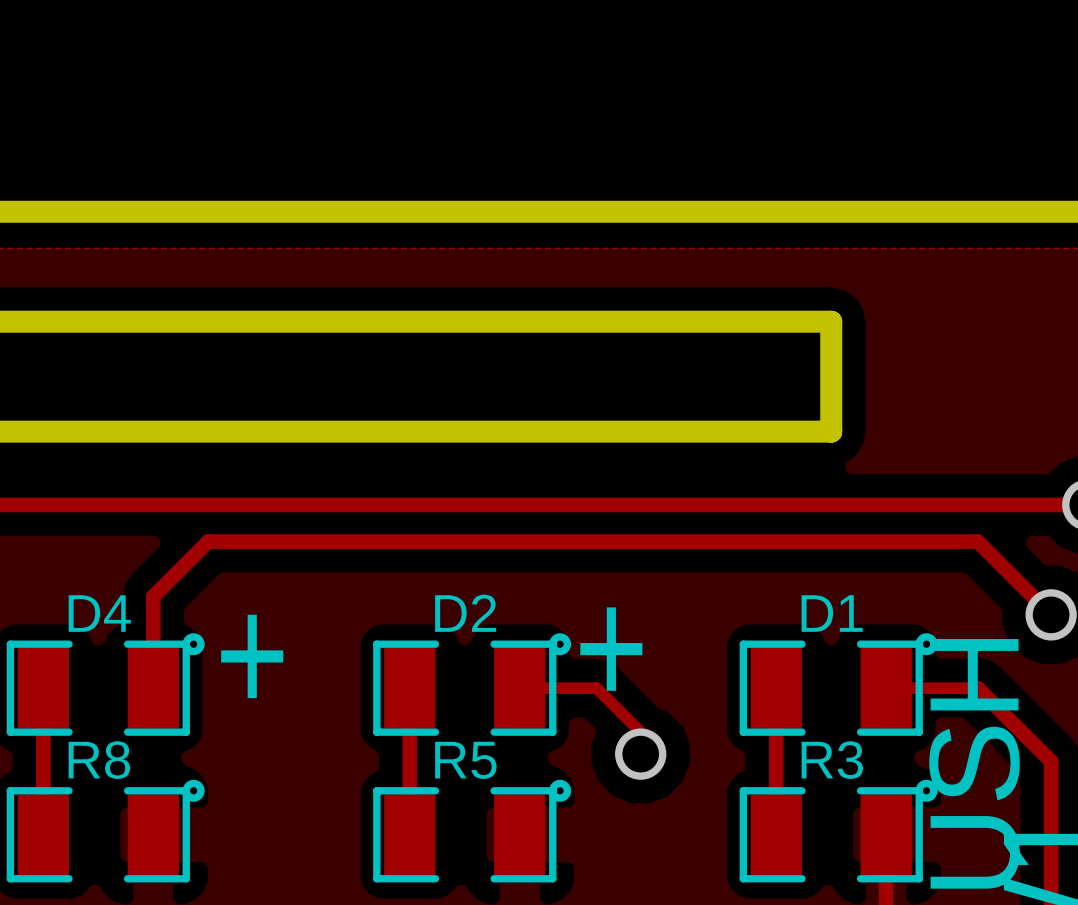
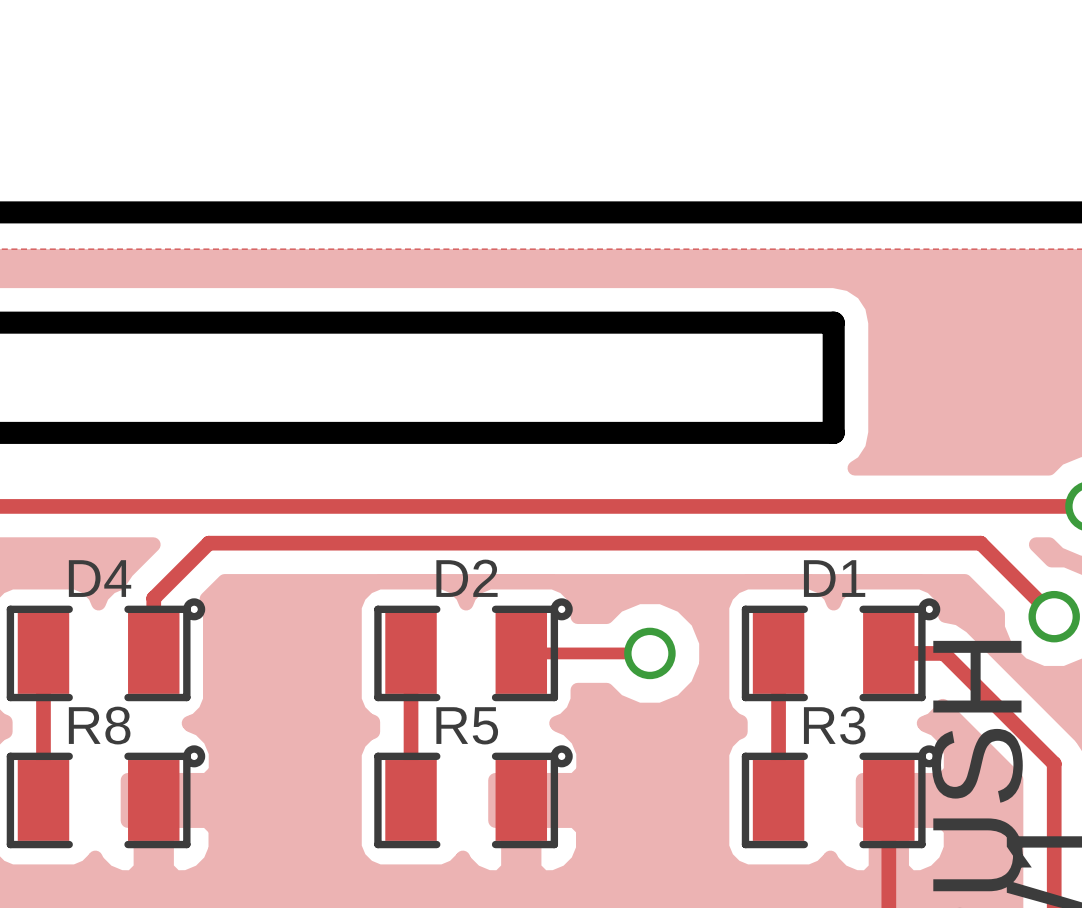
text: + (611, 649) -> none
track: none -> (521, 653) (649, 653)
text: + (252, 656) -> none
D4 position: (105, 684) -> (105, 649)
D2 position: (472, 684) -> (473, 649)
D1 position: (838, 684) -> (841, 649)
track: (519, 688) (596, 688) (640, 732) (640, 754) -> none
track: (886, 688) (977, 688) -> (888, 653) (943, 653) (980, 690)
via position: (640, 754) -> (649, 653)
R8 position: (105, 831) -> (105, 796)
R5 position: (472, 831) -> (473, 796)
R3 position: (838, 831) -> (841, 796)

